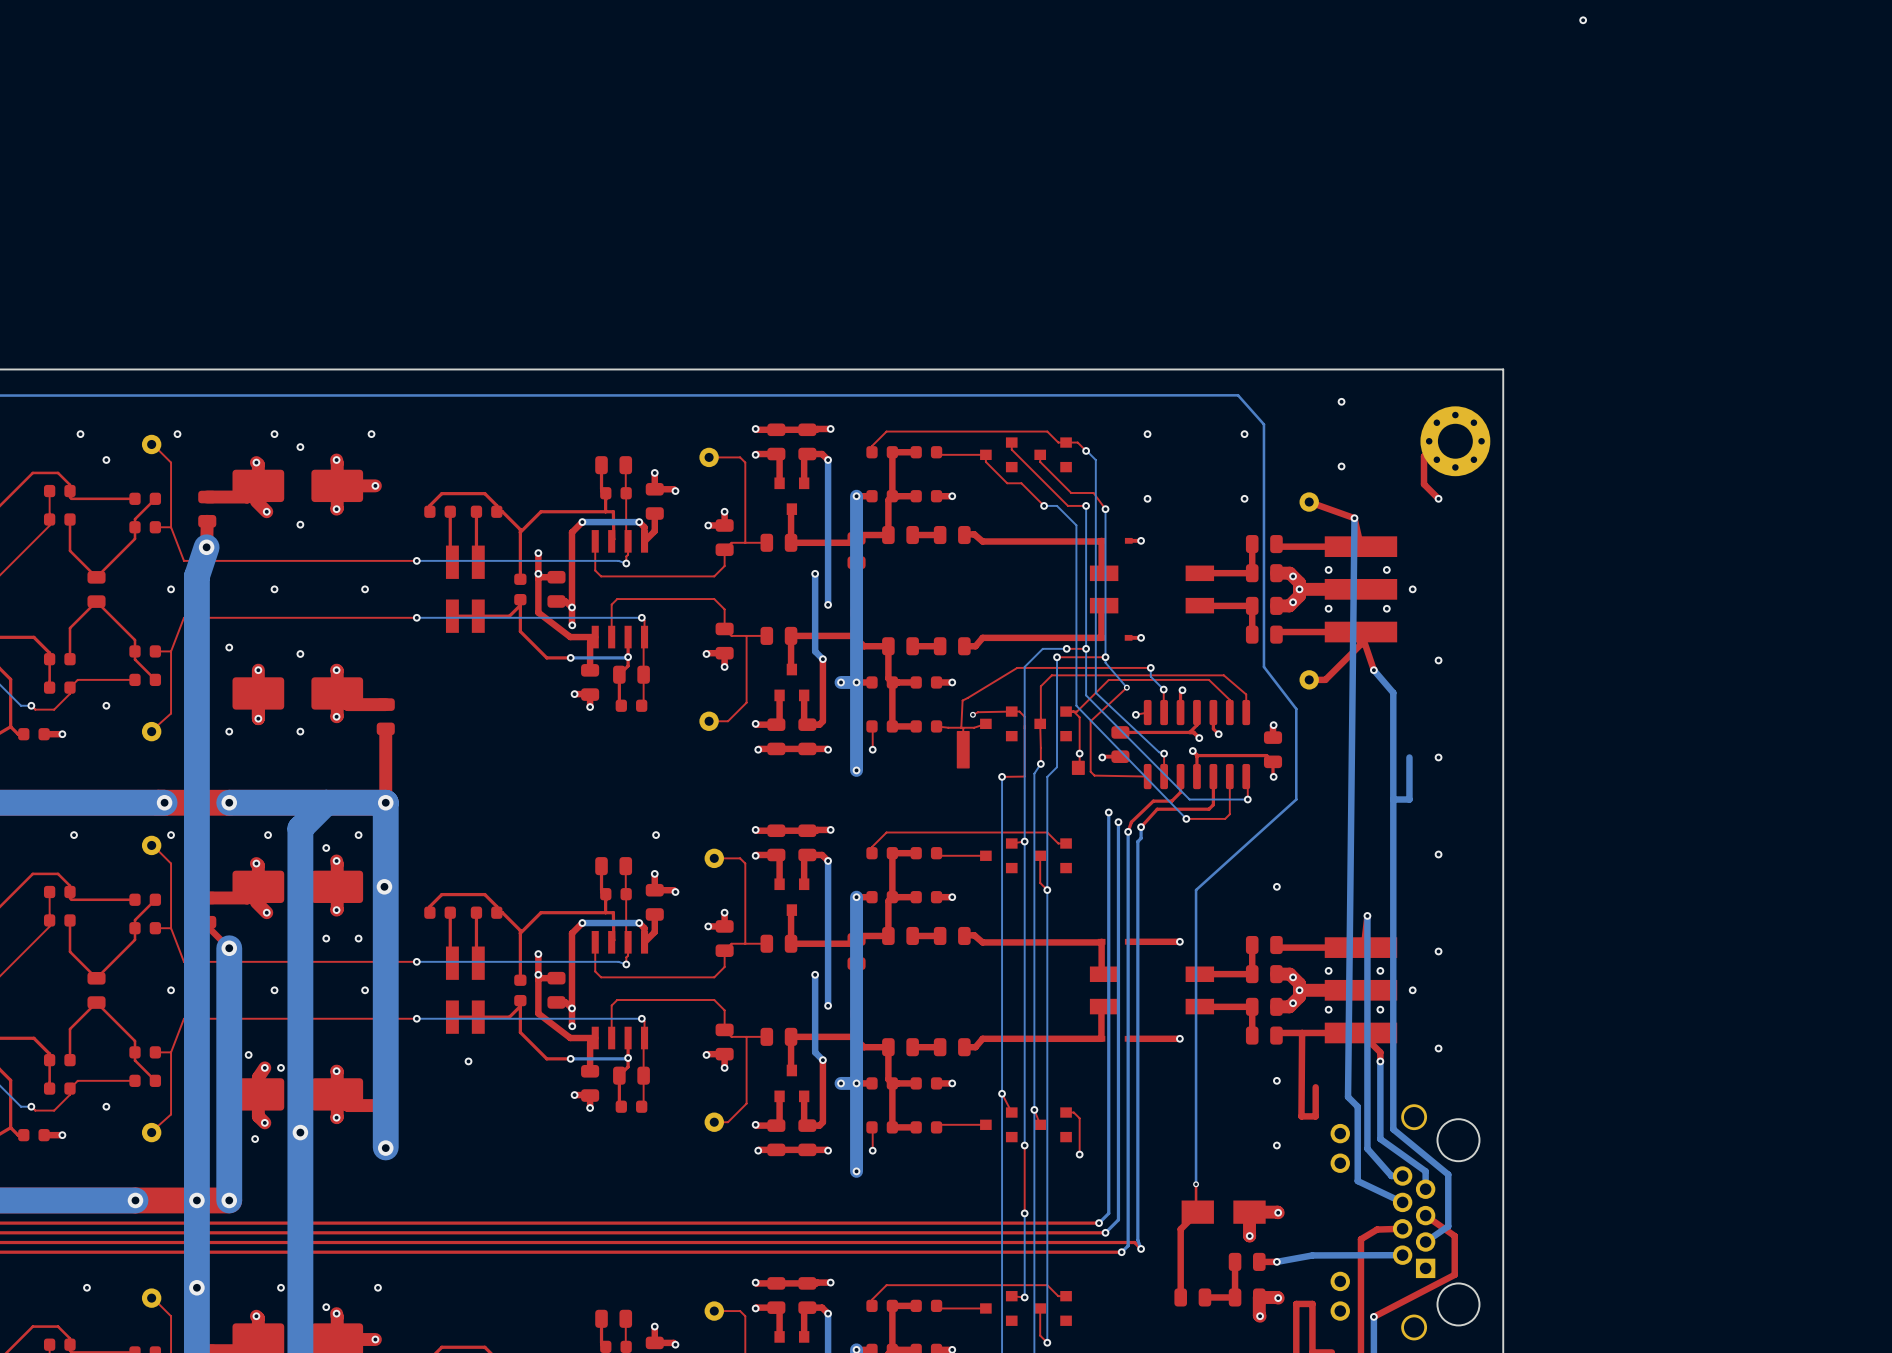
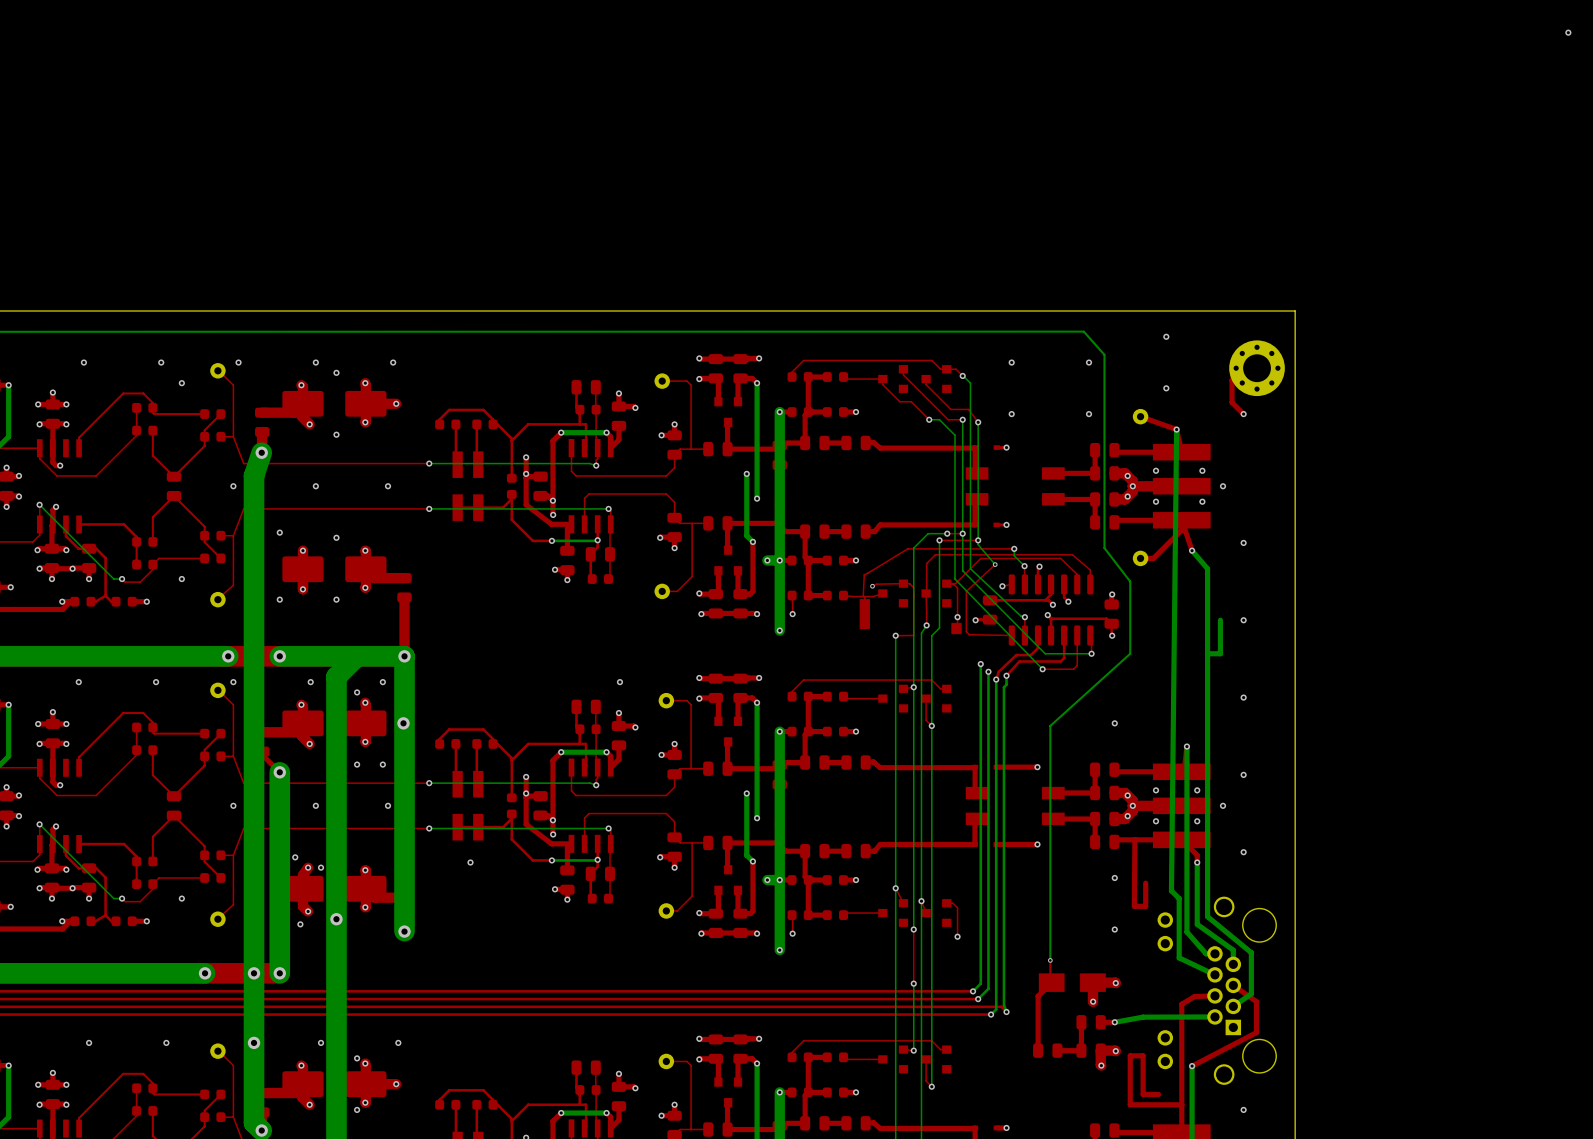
via: (1583, 20) -> none
via: none -> (1568, 32)

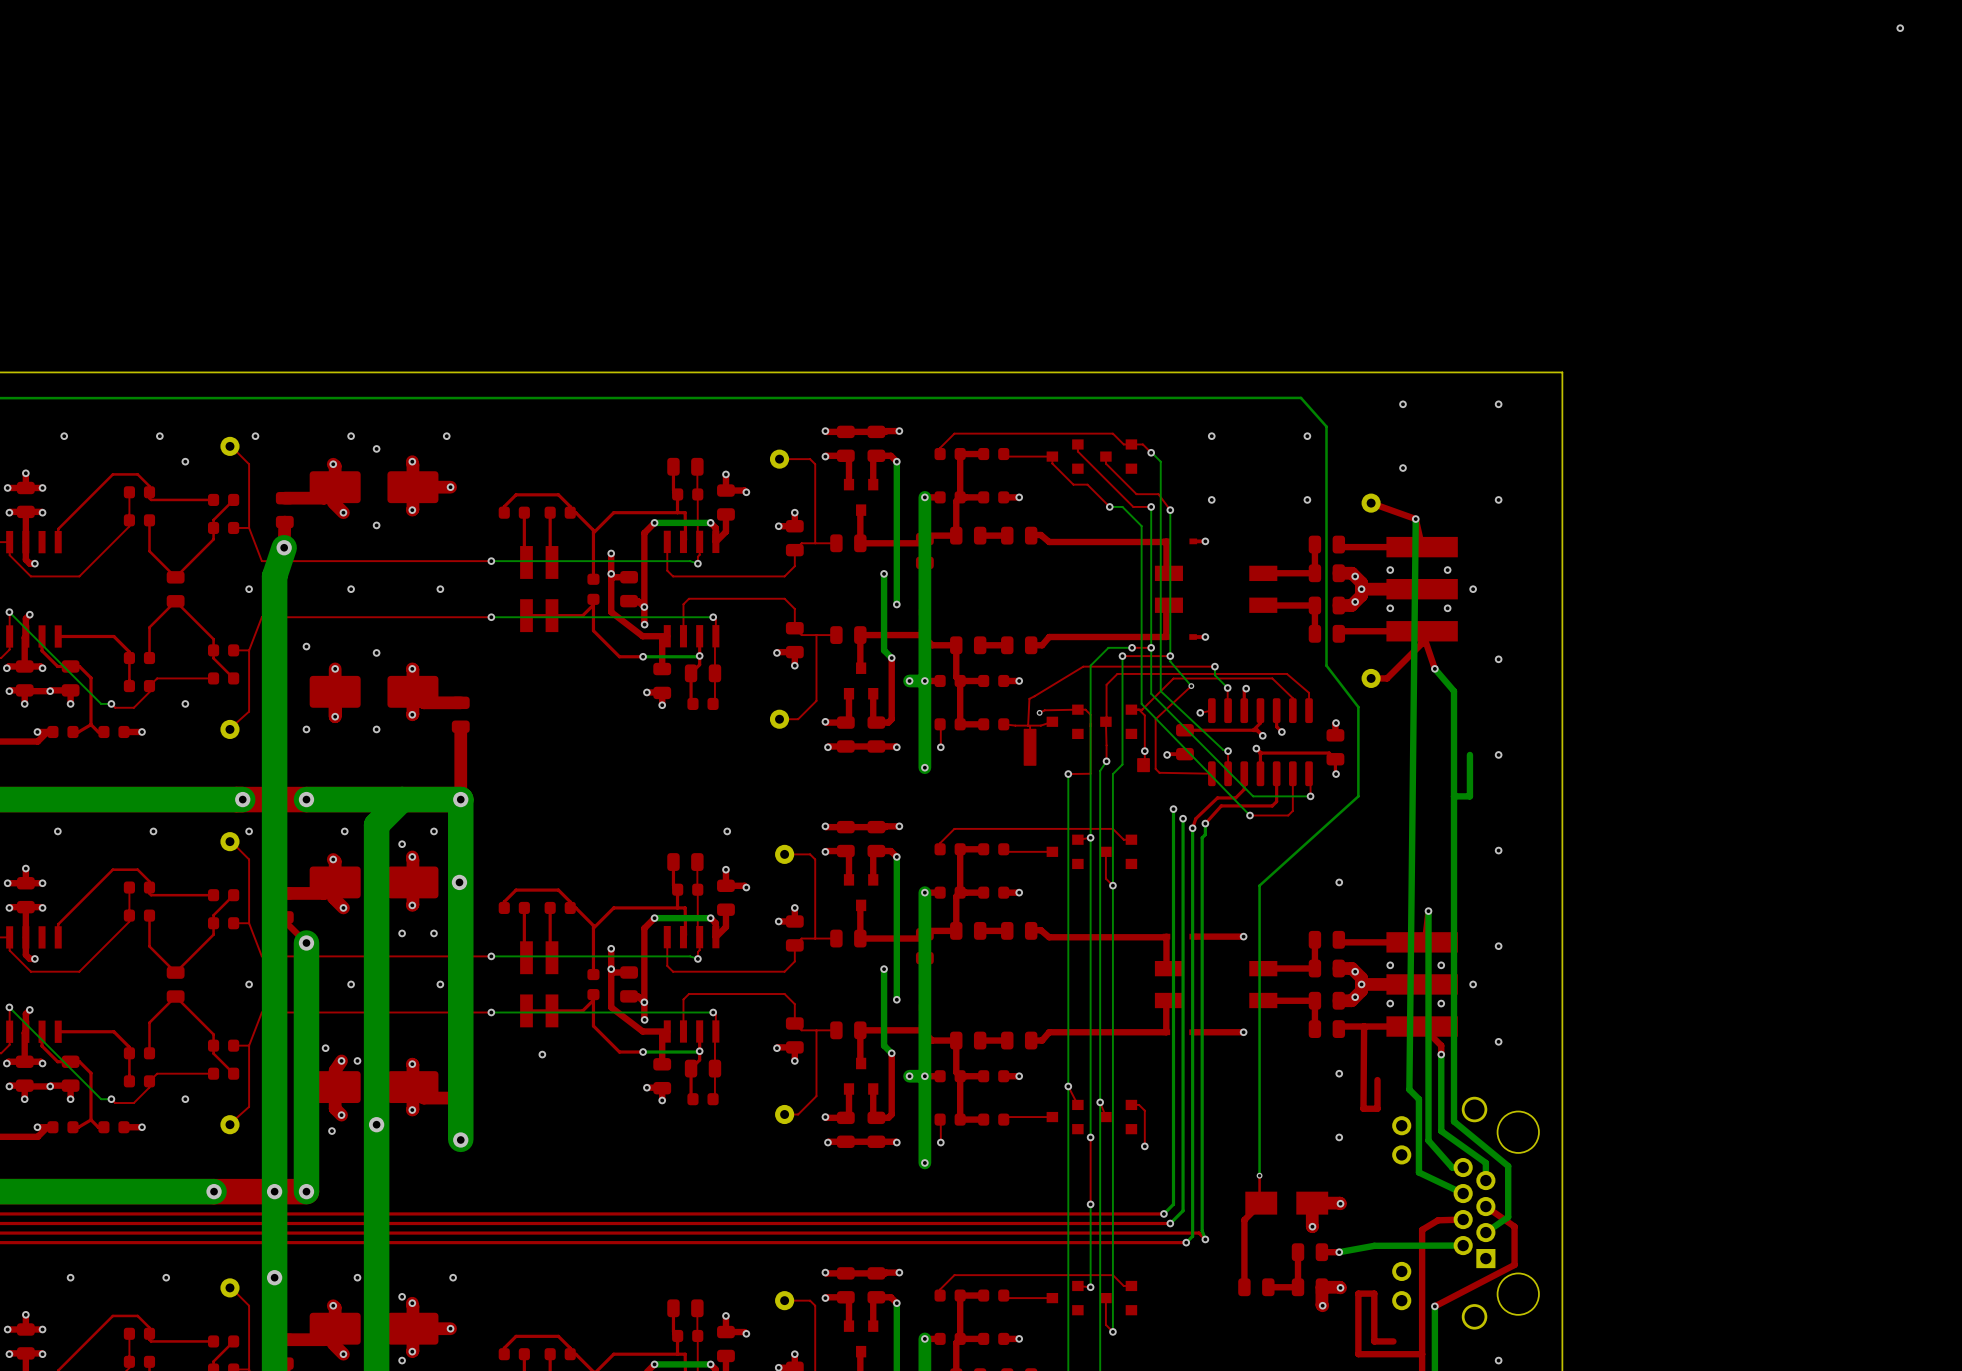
via: none -> (1498, 404)
top track: (1257, 368) (1244, 368) (1232, 380) (1232, 402) (1243, 414) -> none
part: (1257, 368) -> none

